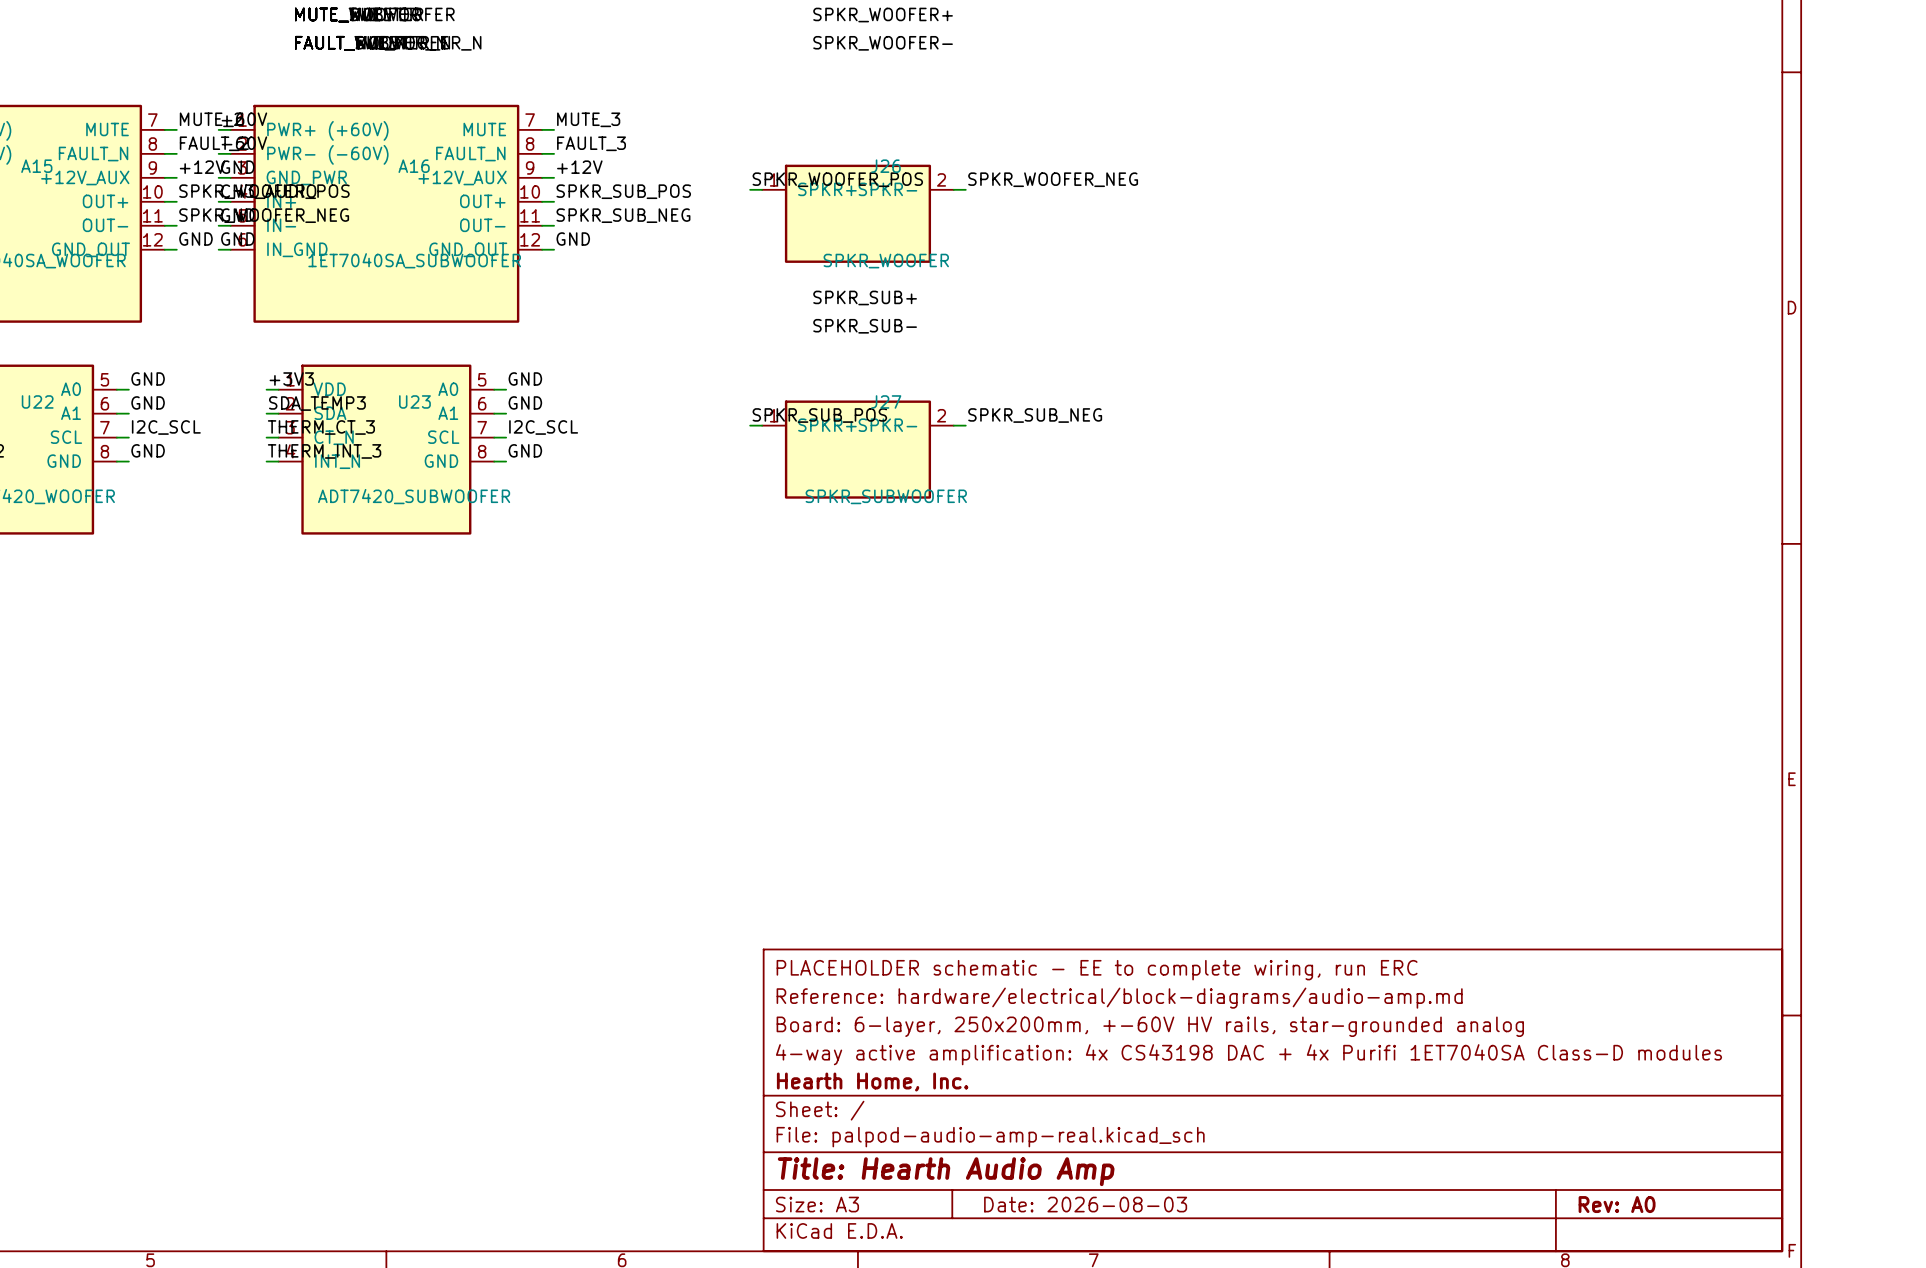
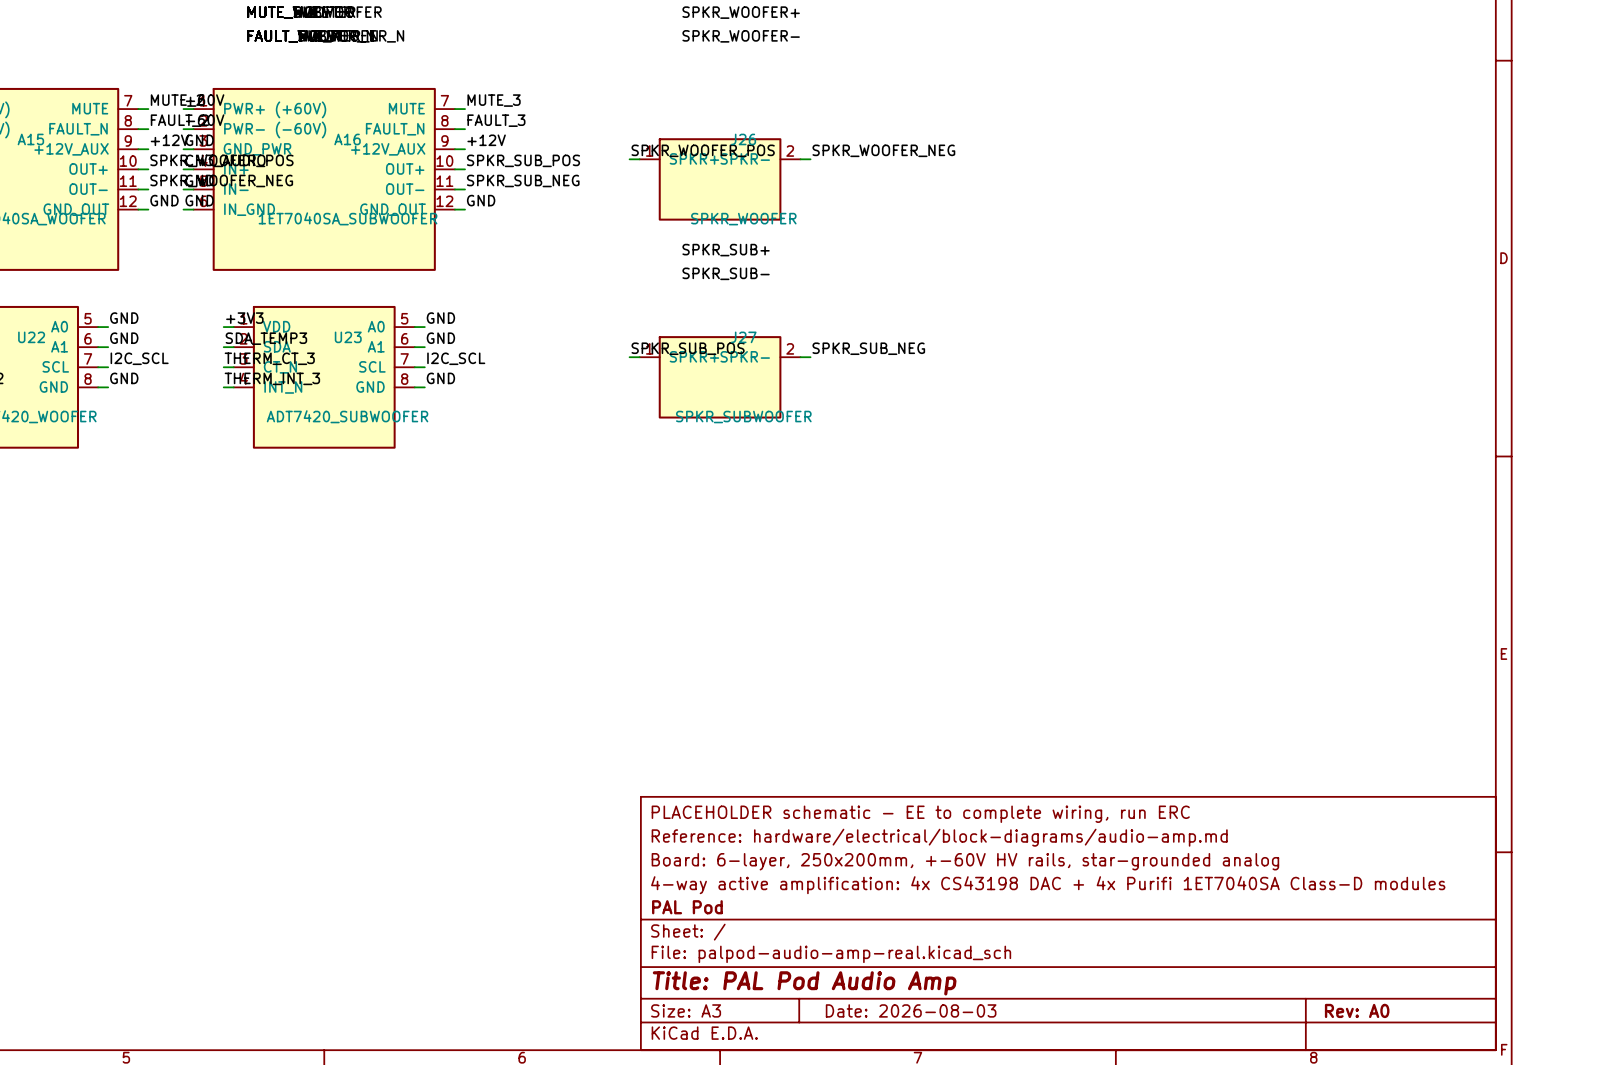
title block: Hearth Home, Inc. (872, 1082) -> PAL Pod (687, 907)
title block: Title: Hearth Audio Amp (946, 1171) -> Title: PAL Pod Audio Amp (804, 983)

